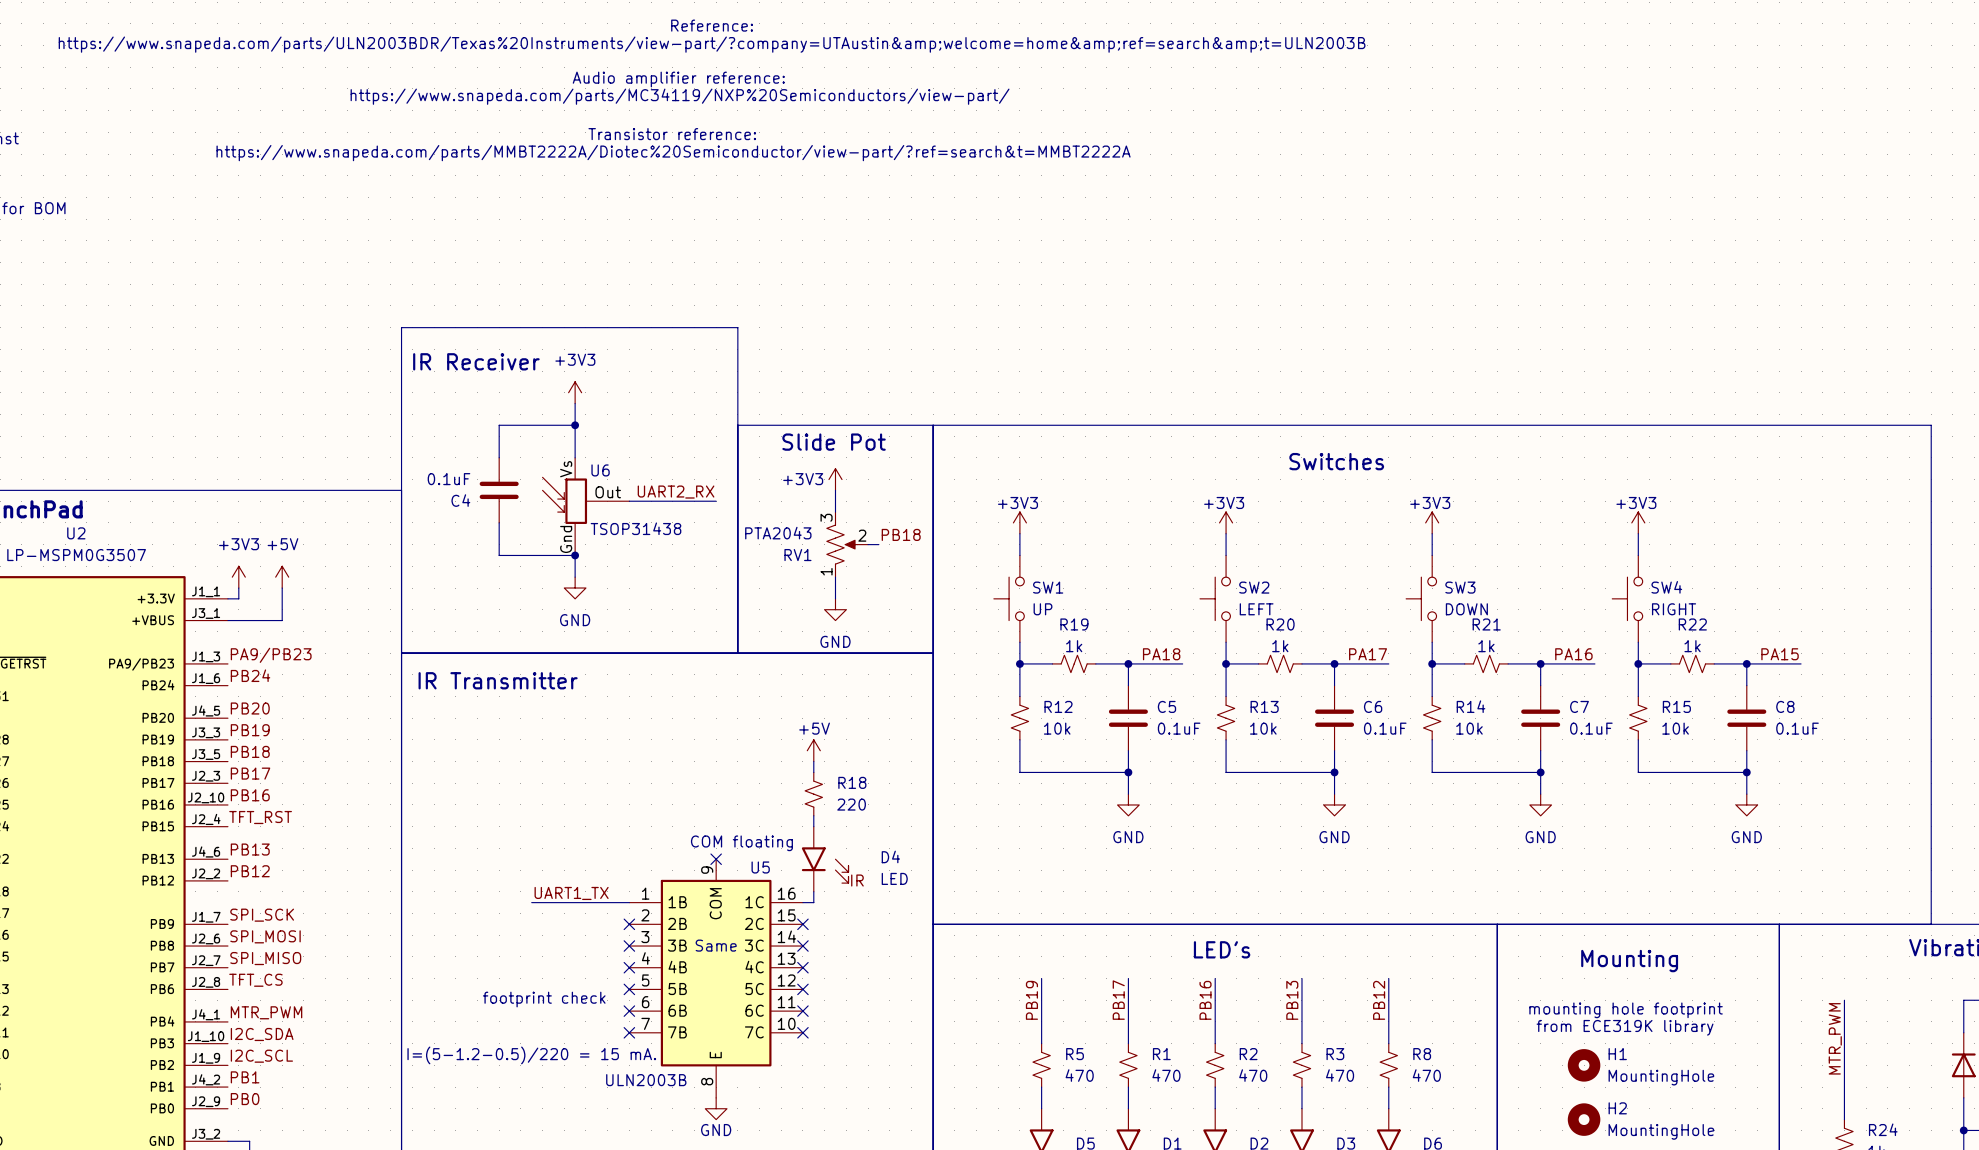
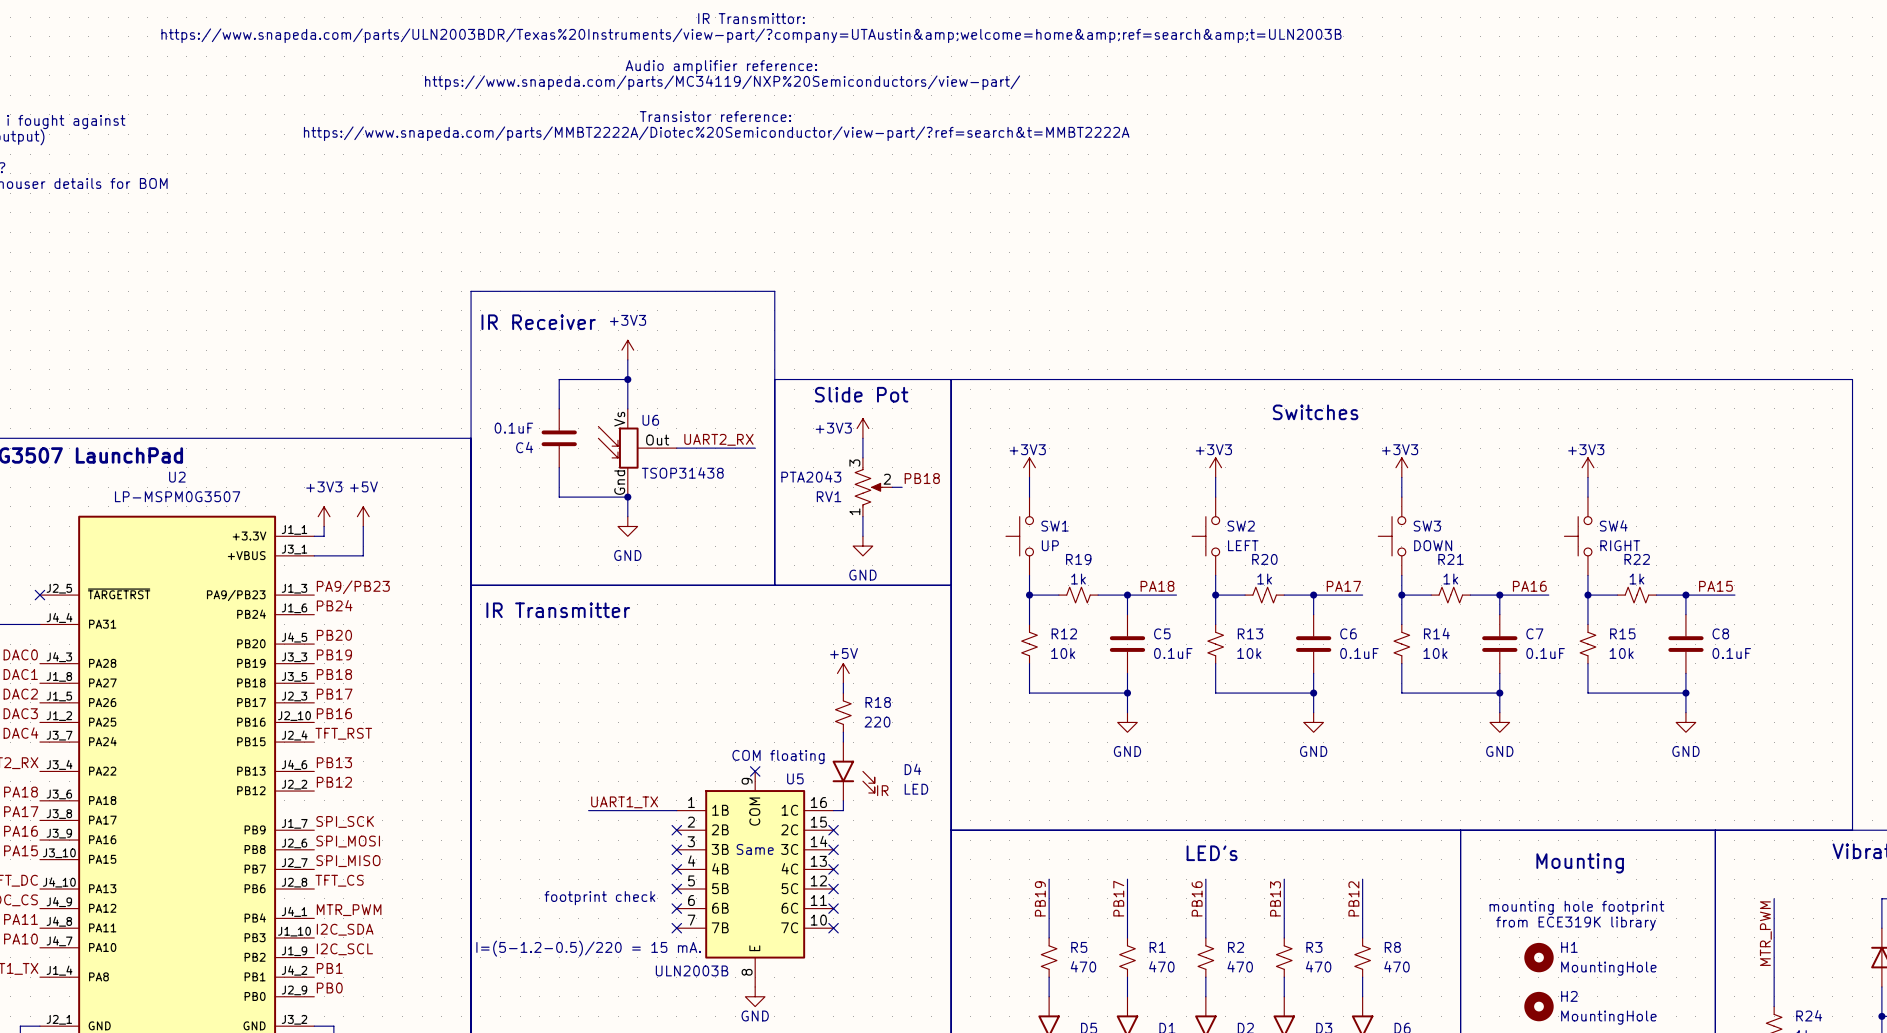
text: Reference: (712, 25) -> IR Transmittor: (751, 18)

